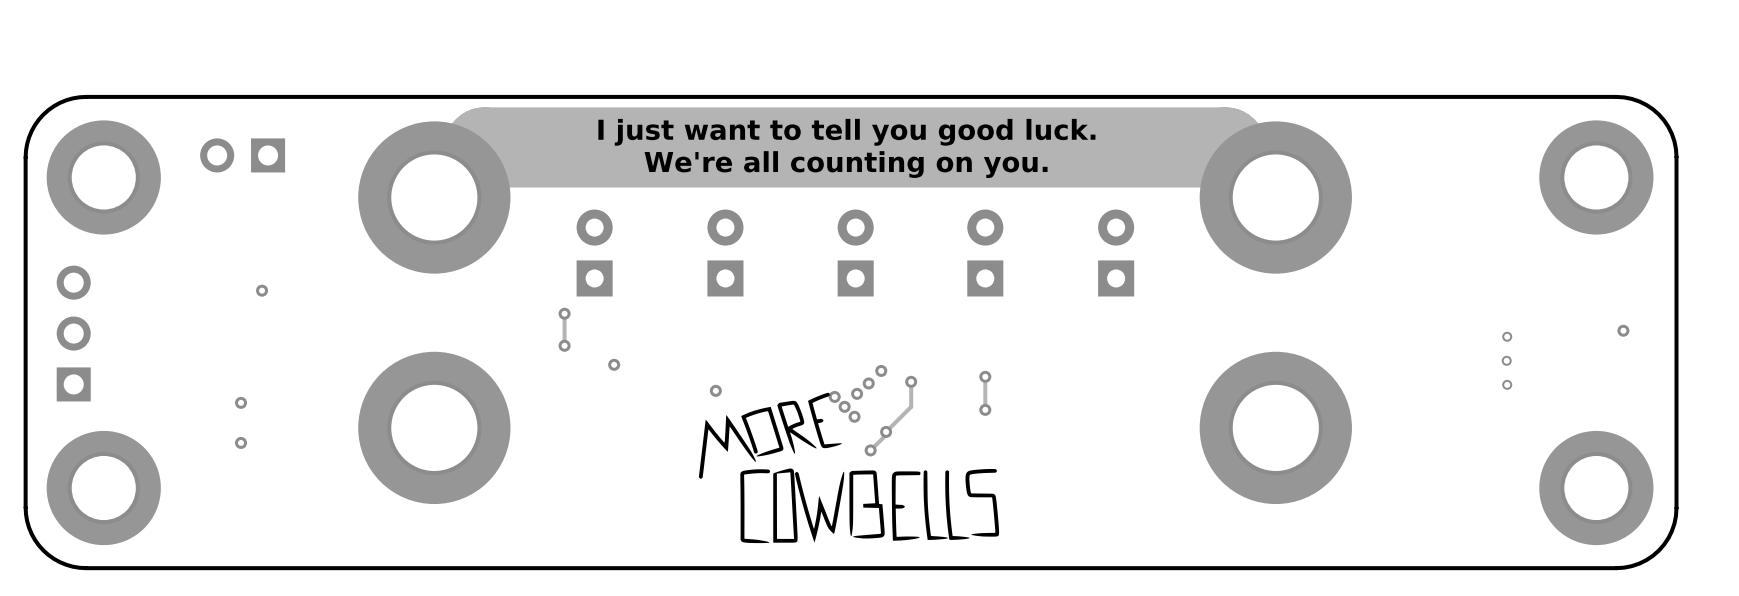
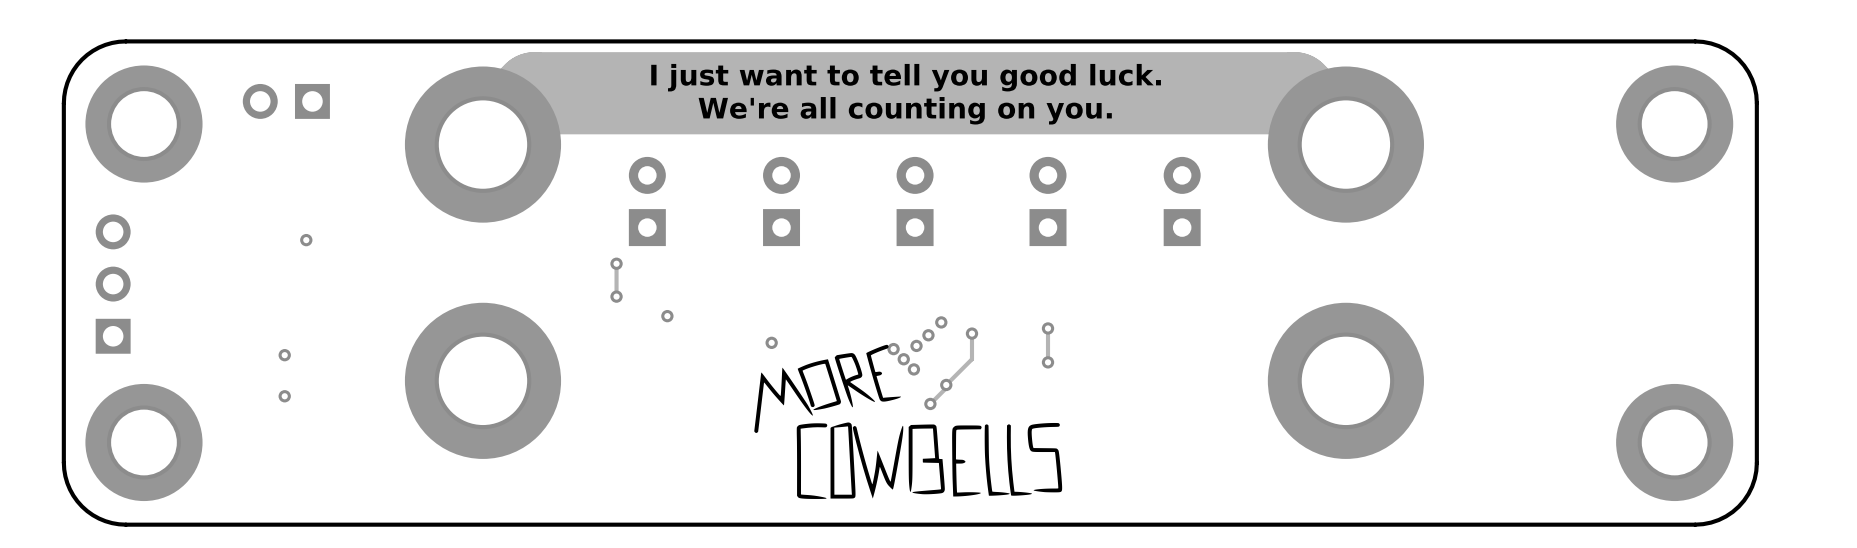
via: (1623, 330) -> none
part: (1506, 360) -> none

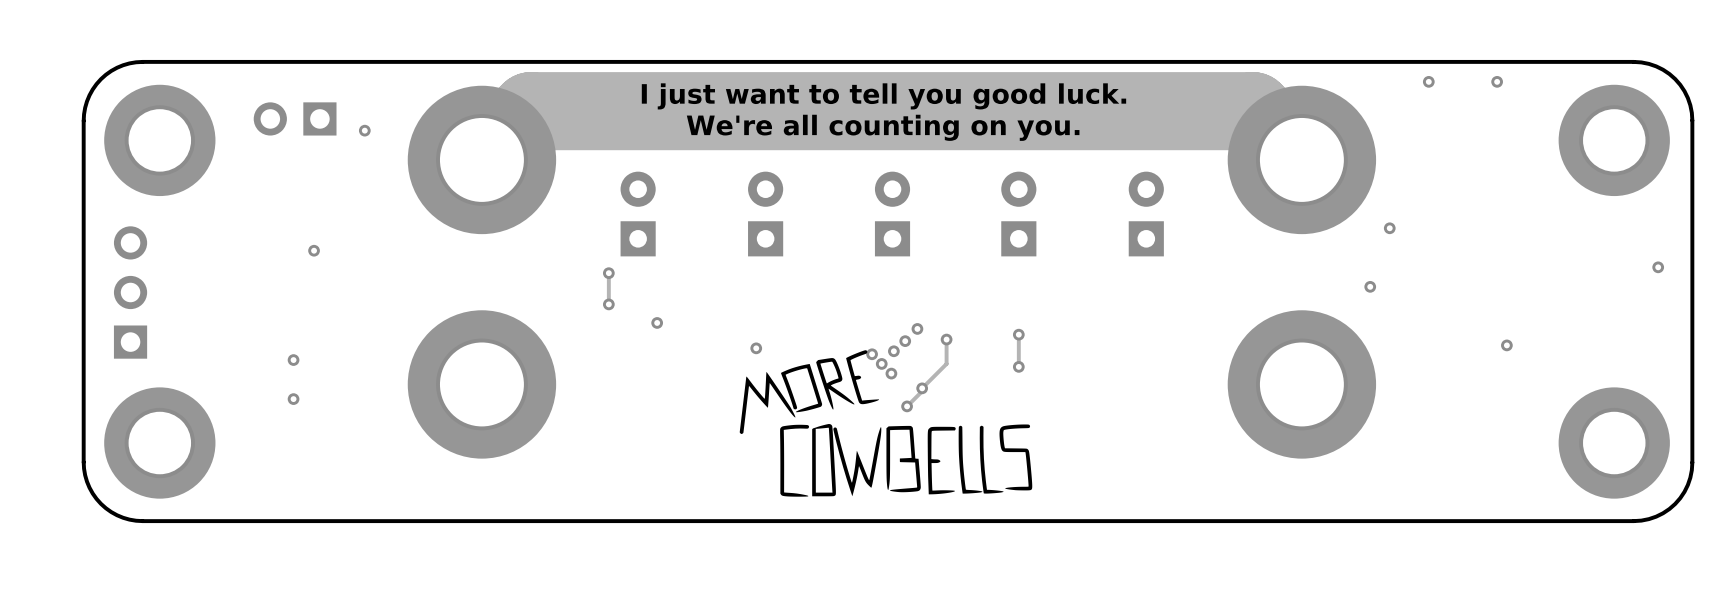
via: none -> (1428, 81)
via: none -> (1497, 81)
via: none -> (364, 130)
via: none -> (1389, 228)
via: none -> (1658, 267)
via: none -> (1370, 286)
via: none -> (1506, 345)

